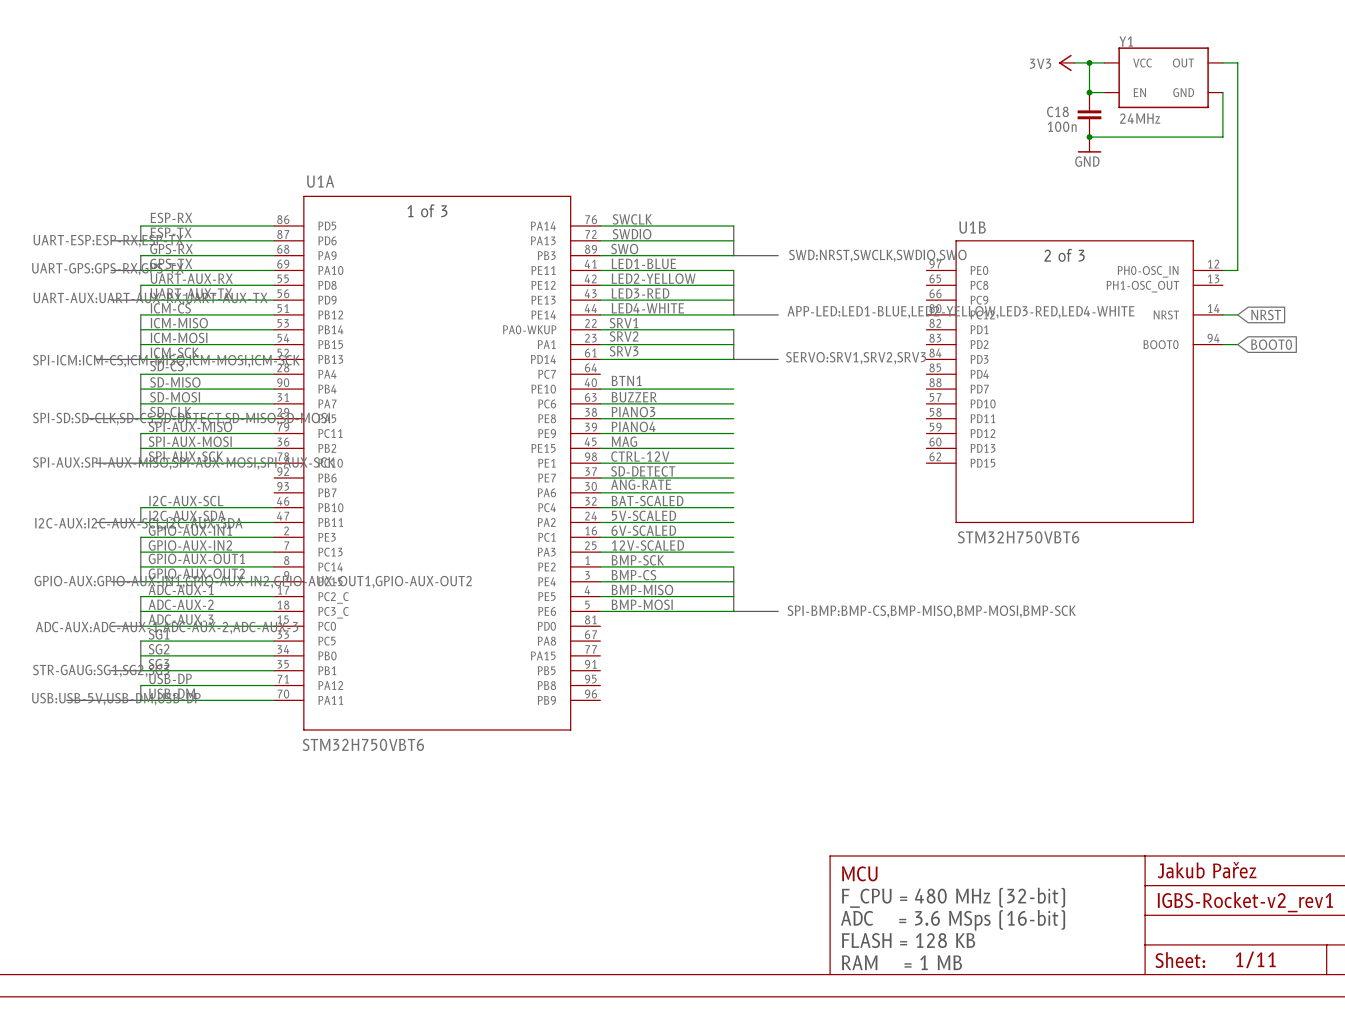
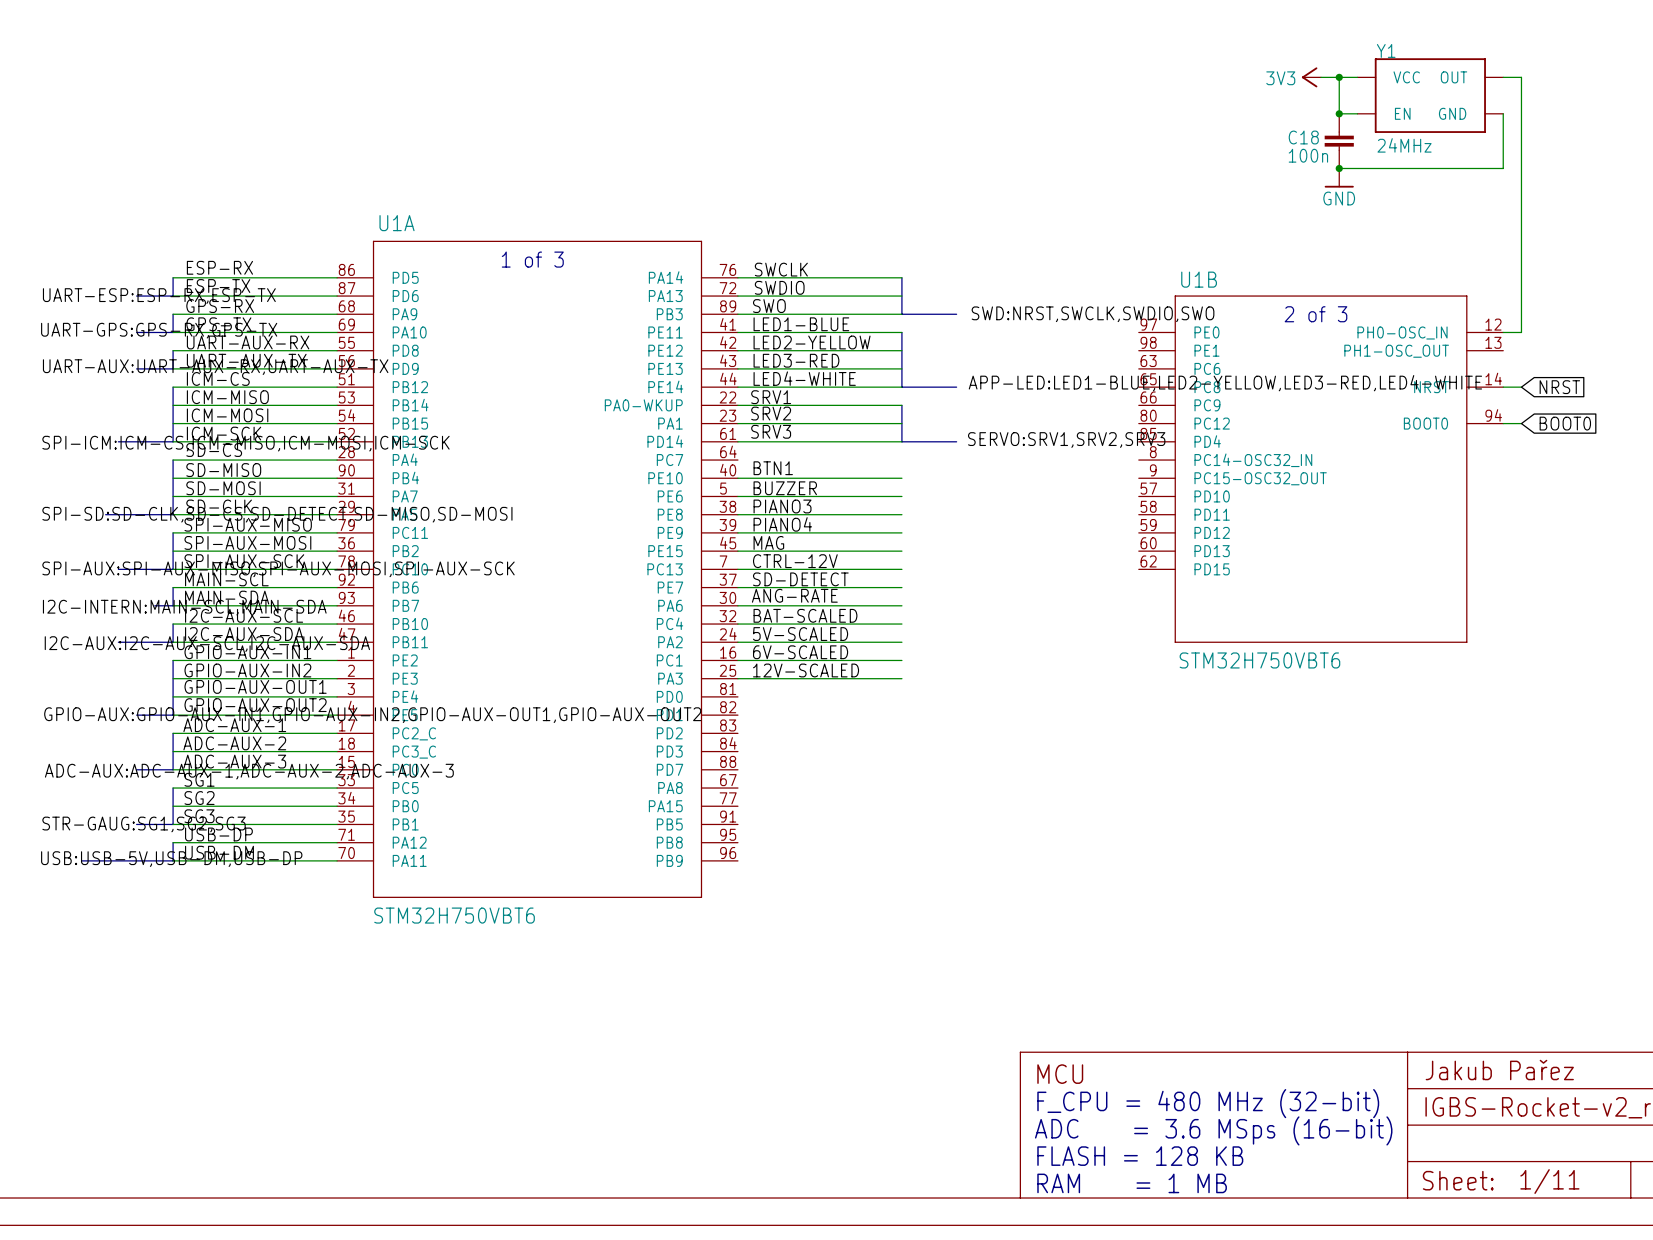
U1A symbol: [274, 195, 601, 731] -> [337, 240, 738, 898]
U1B symbol: [926, 240, 1223, 523] -> [1138, 295, 1504, 643]
label: none -> MAIN-SCL (226, 579)
bus: none -> (173, 587) (173, 605) (154, 605)
wire: none -> (173, 587) (337, 587)
label: none -> MAIN-SDA (227, 597)
wire: none -> (173, 605) (337, 605)
label: none -> I2C-INTERN:MAIN-SCL,MAIN-SDA (184, 607)
label: BMP-SCK (637, 560) -> none
wire: (600, 566) (733, 566) -> none
bus: (733, 566) (733, 611) (778, 611) -> none
label: BMP-CS (633, 575) -> none
wire: (600, 581) (733, 581) -> none
label: BMP-MISO (642, 589) -> none
wire: (600, 596) (733, 596) -> none
label: BMP-MOSI (642, 604) -> none
wire: (600, 611) (733, 611) -> none
label: SPI-BMP:BMP-CS,BMP-MISO,BMP-MOSI,BMP-SCK (931, 611) -> none

